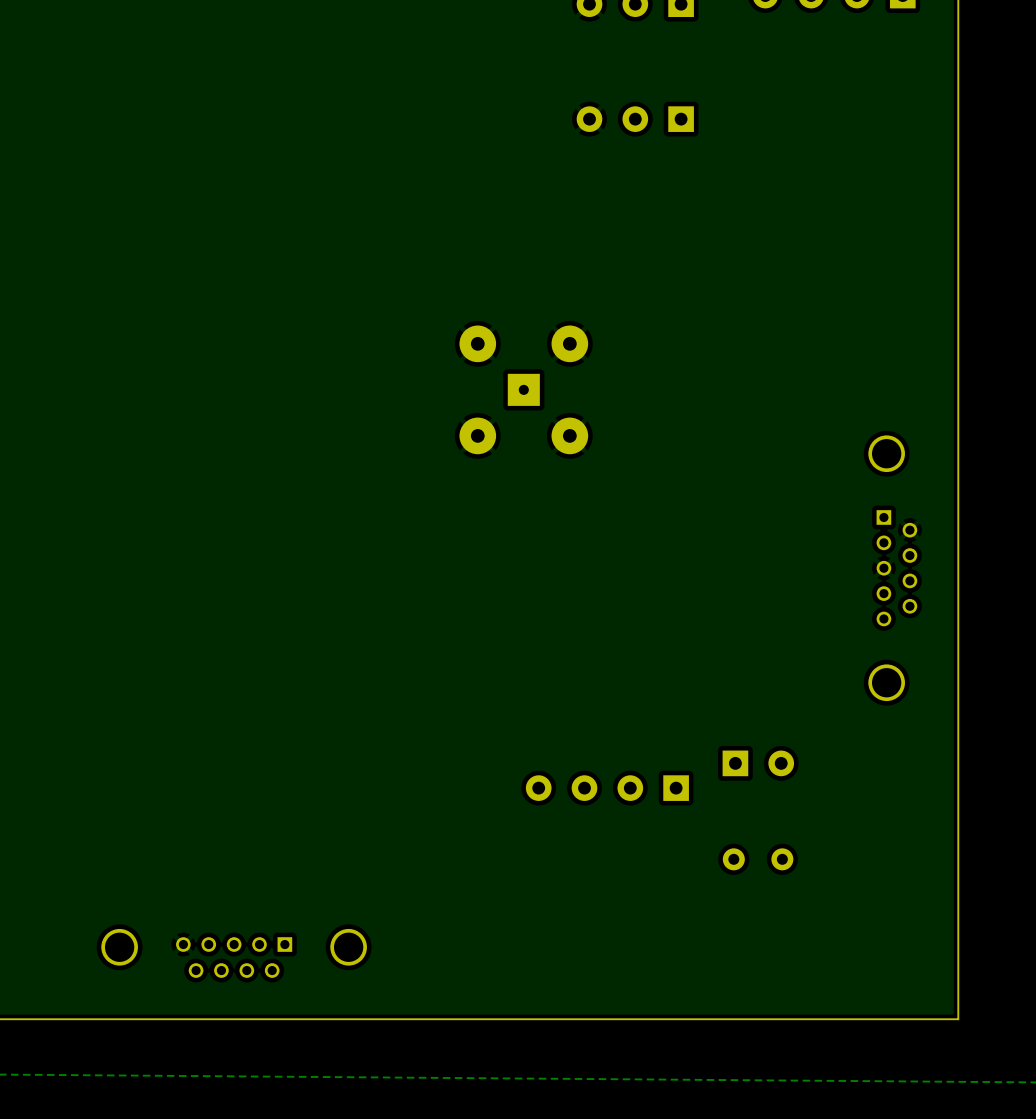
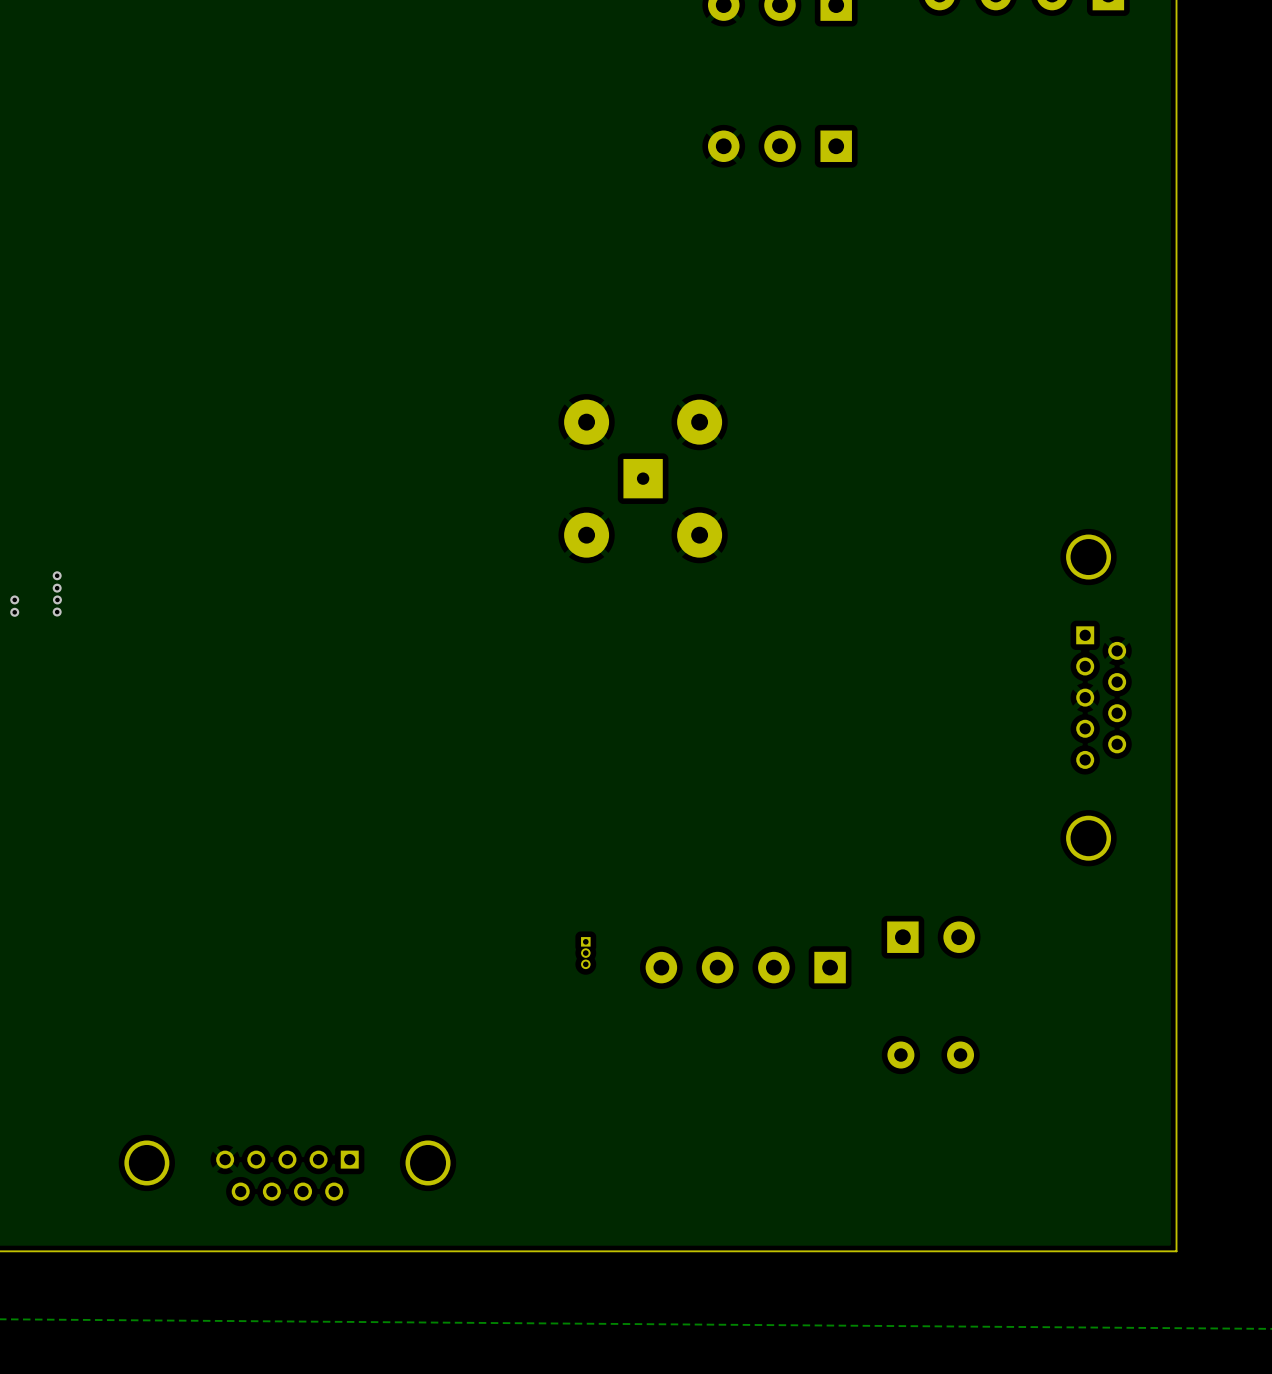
via: none -> (57, 575)
via: none -> (57, 588)
via: none -> (14, 599)
via: none -> (57, 599)
via: none -> (14, 612)
via: none -> (57, 612)
part: none -> (585, 953)

